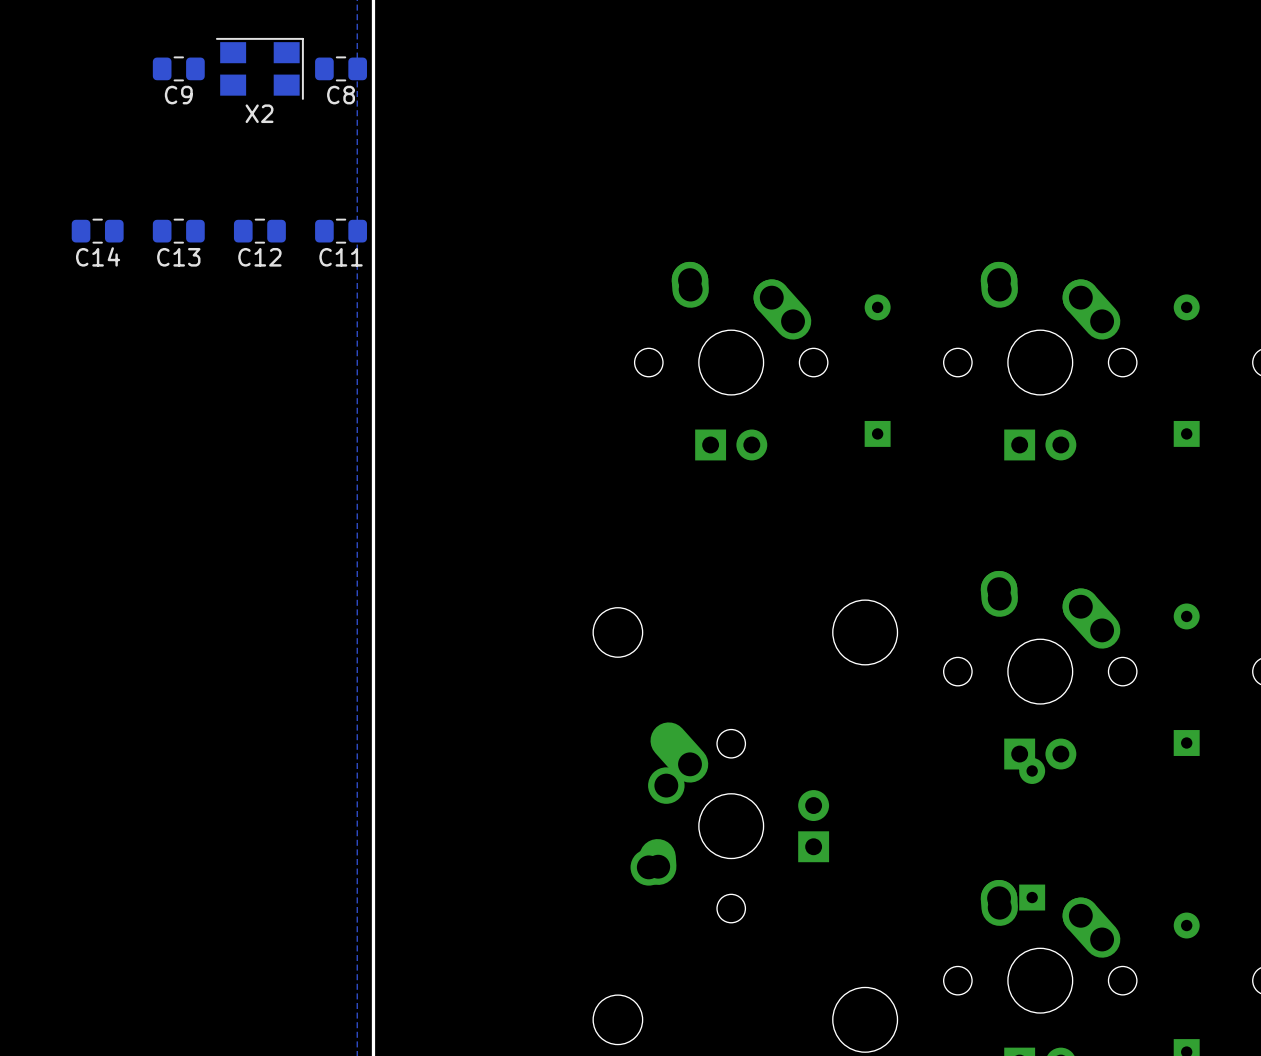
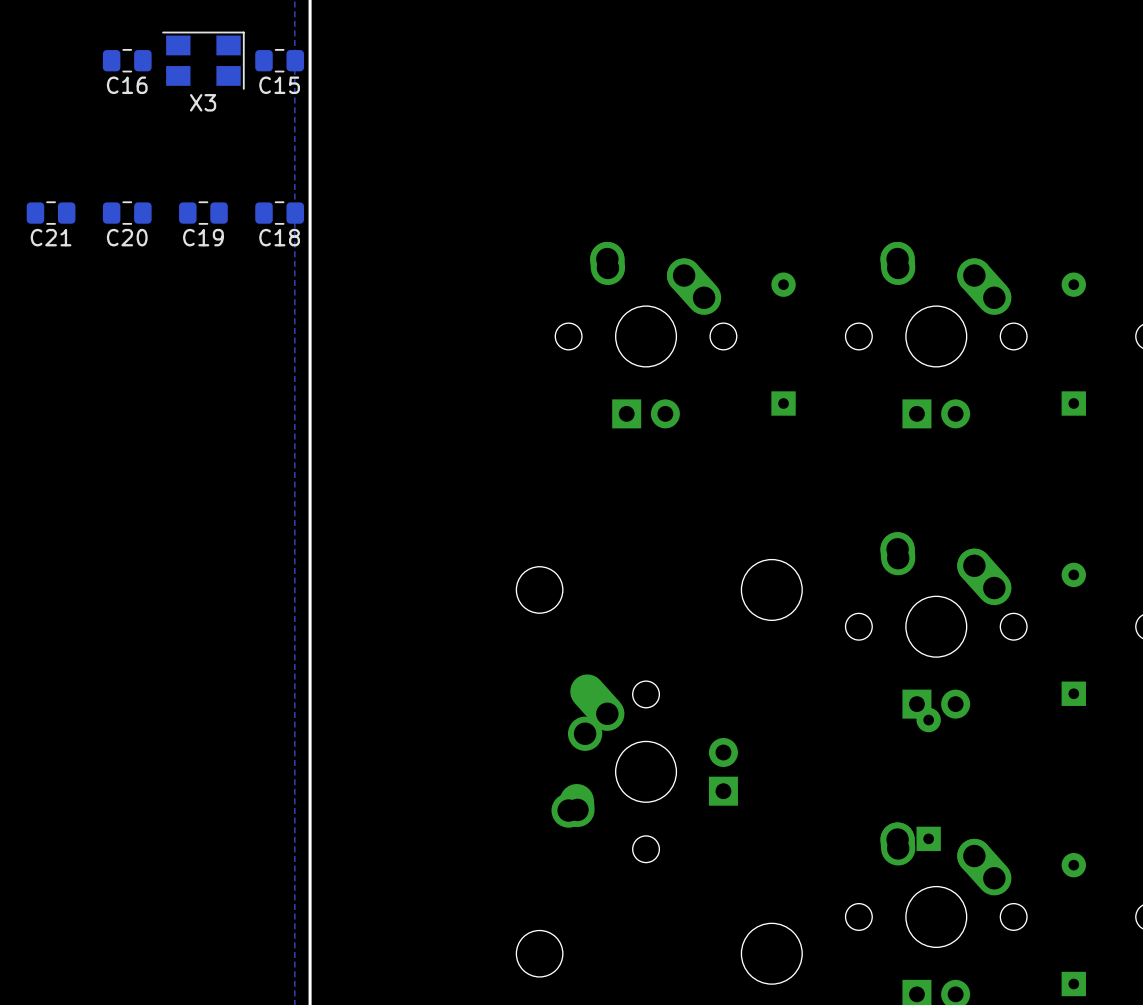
C9 name: C9 (178, 95) -> C16 (127, 85)
C8 name: C8 (341, 95) -> C15 (279, 85)
X2 name: X2 (259, 113) -> X3 (203, 102)
C14 name: C14 (98, 256) -> C21 (51, 237)
C13 name: C13 (178, 257) -> C20 (127, 237)
C12 name: C12 (259, 257) -> C19 (203, 237)
C11 name: C11 (341, 257) -> C18 (279, 237)

